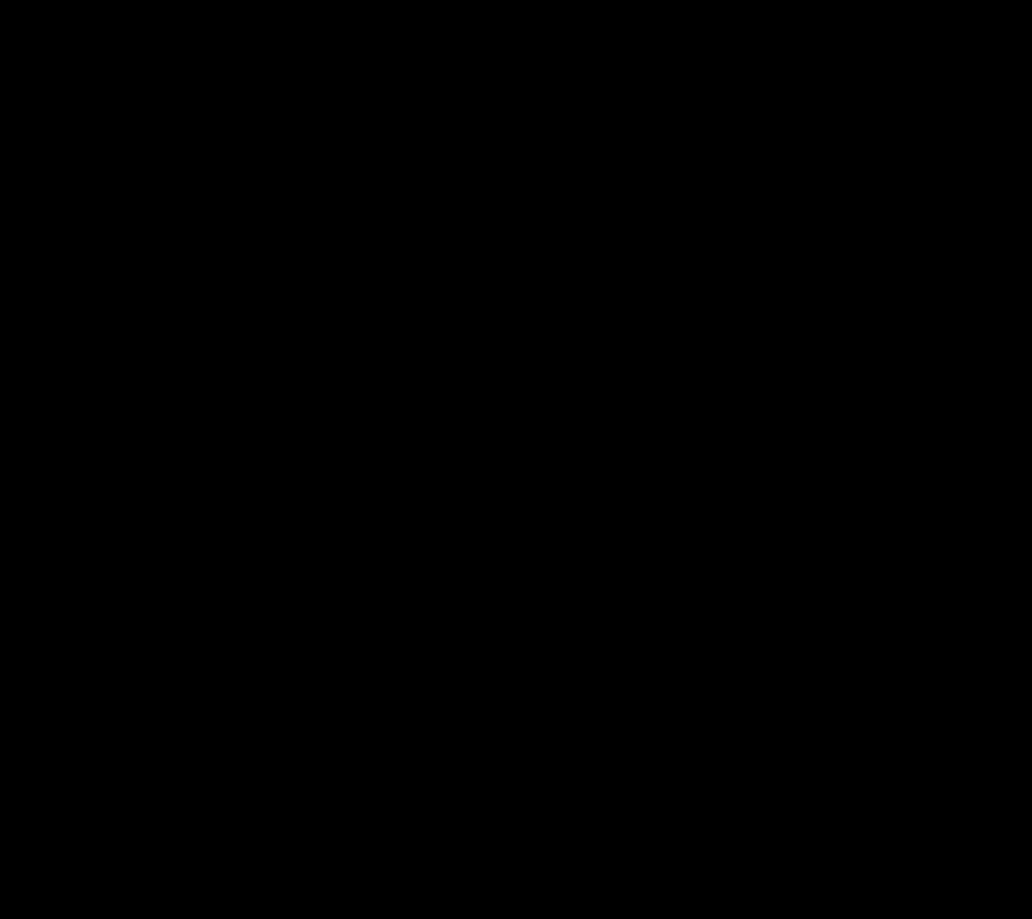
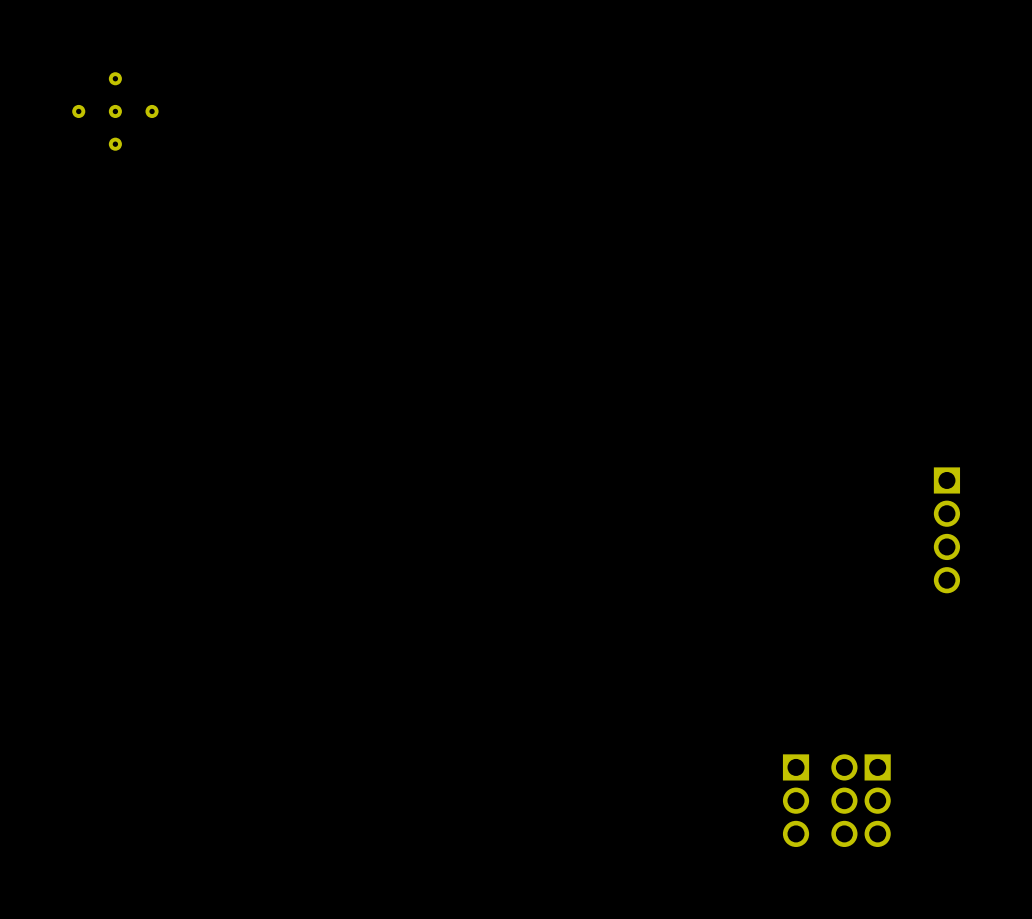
part: none -> (115, 111)
part: none -> (946, 530)
part: none -> (796, 800)
part: none -> (861, 800)

